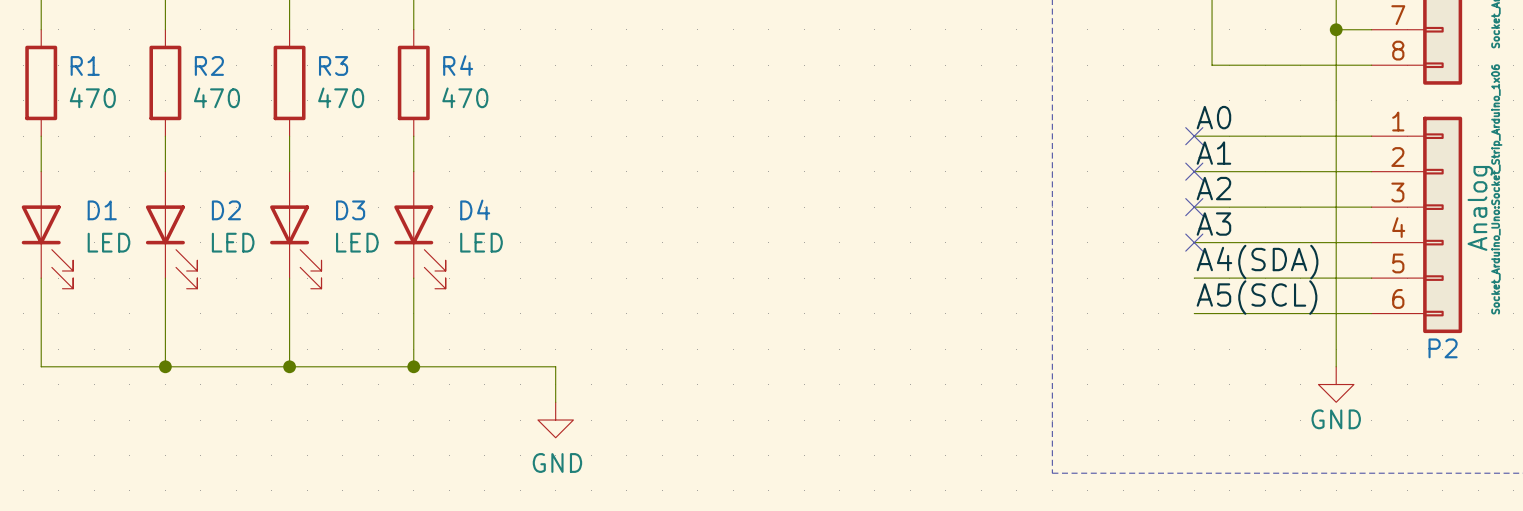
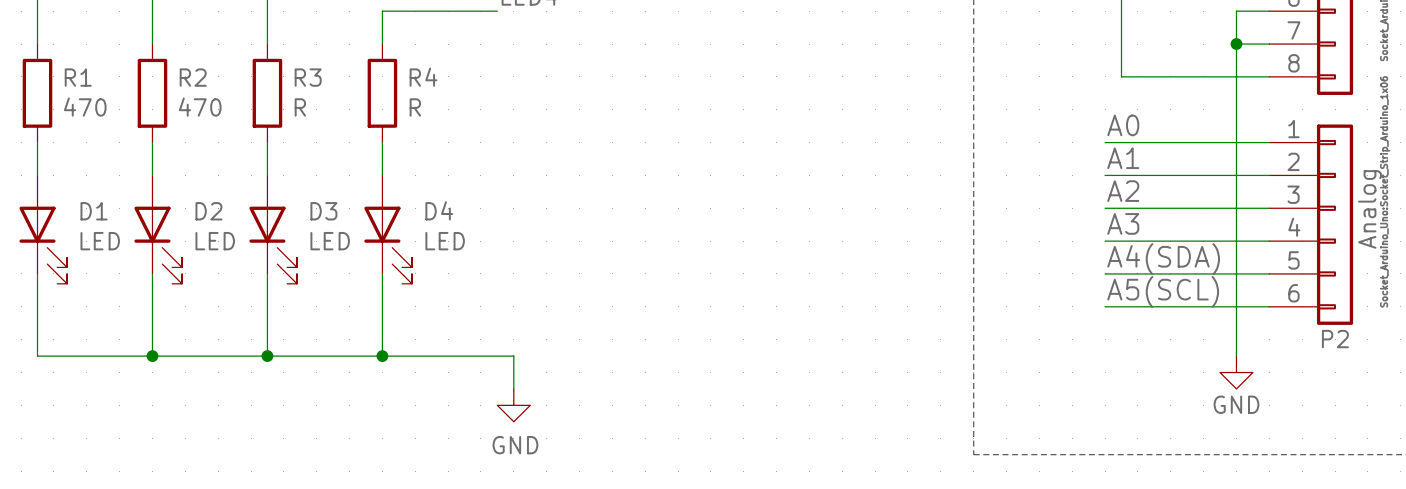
R3 value: 470 (341, 97) -> R (300, 107)
R4 value: 470 (465, 97) -> R (415, 107)
no-connect mark: (1194, 136) -> none
no-connect mark: (1194, 171) -> none
no-connect mark: (1194, 207) -> none
no-connect mark: (1194, 242) -> none

